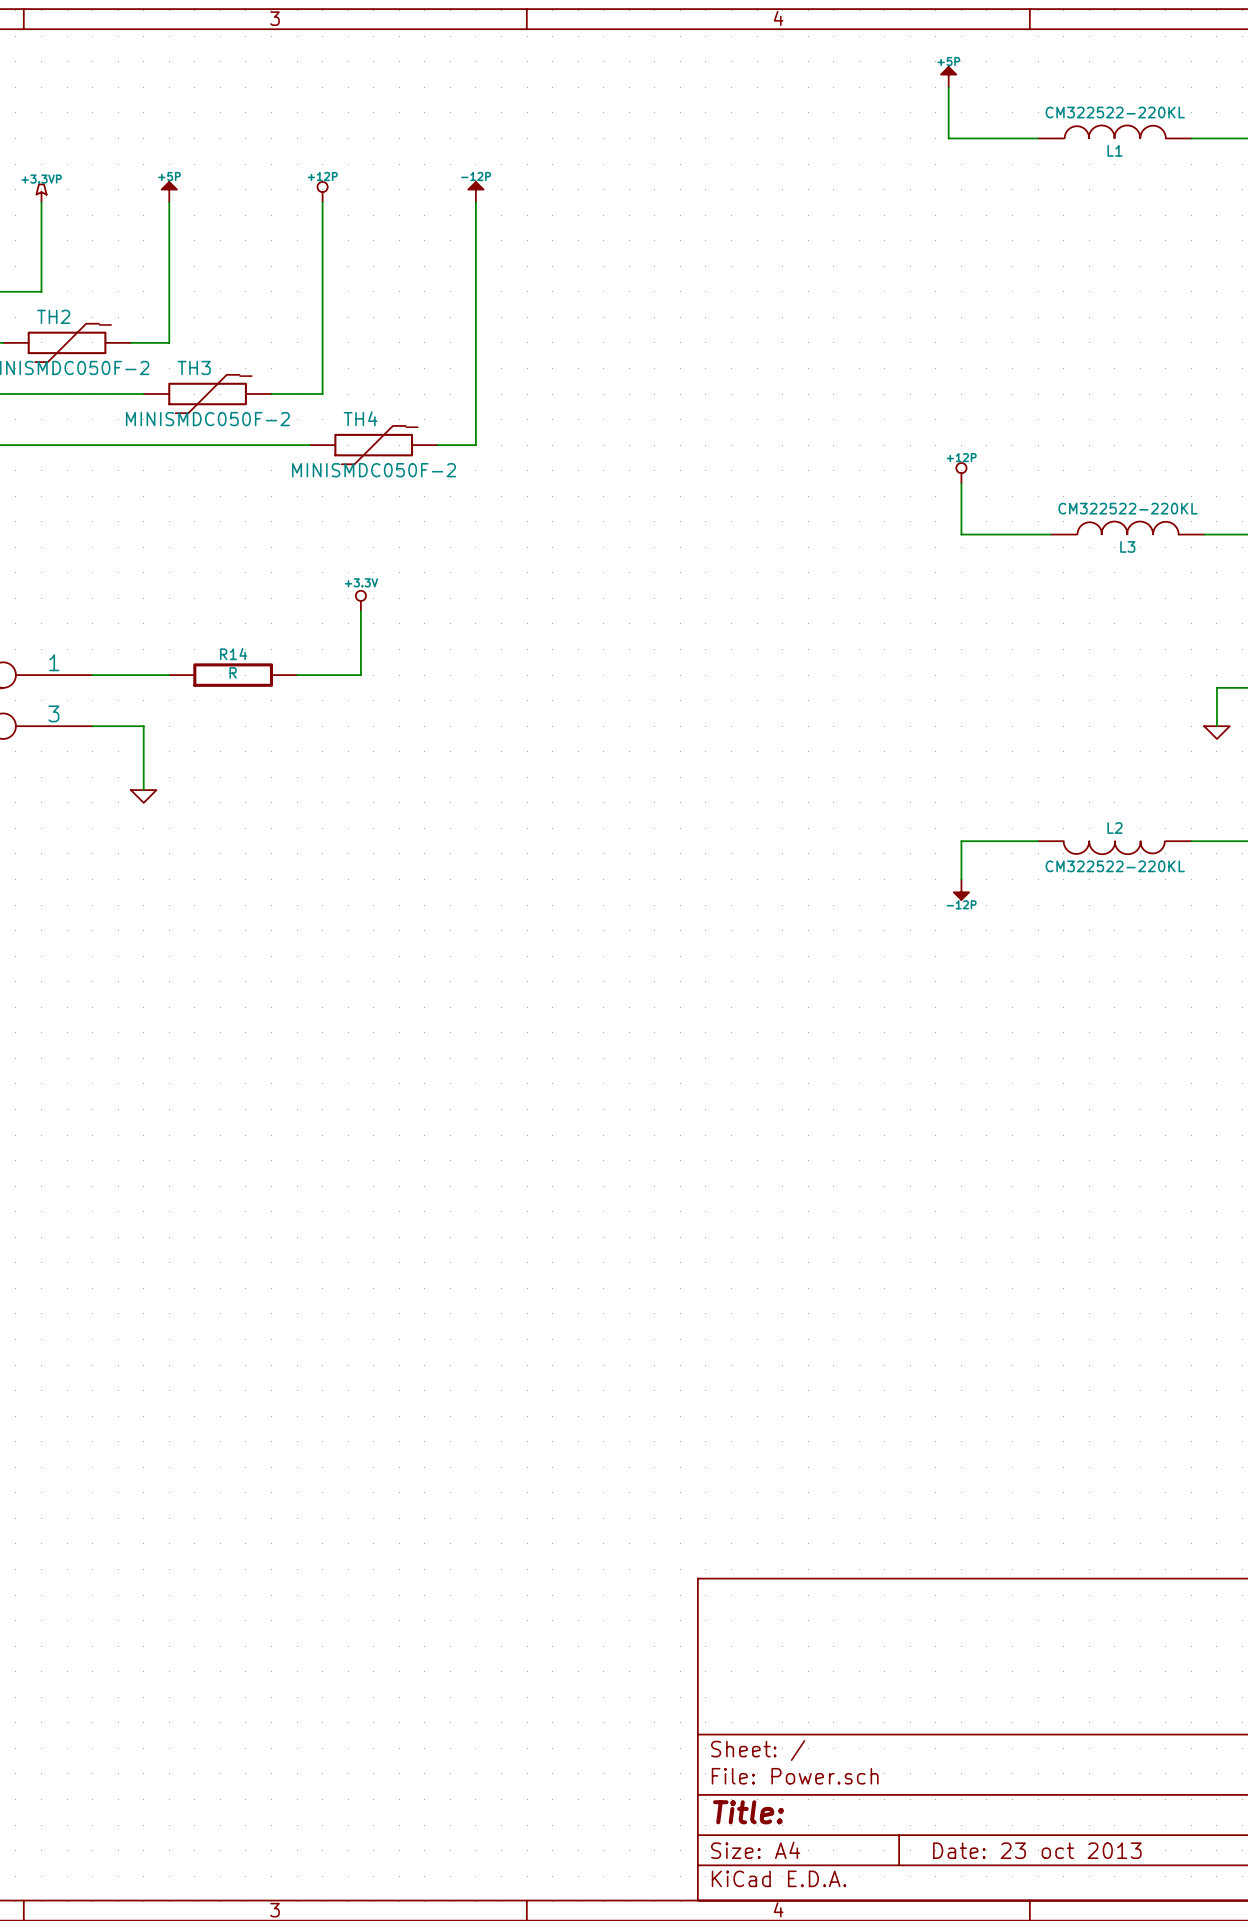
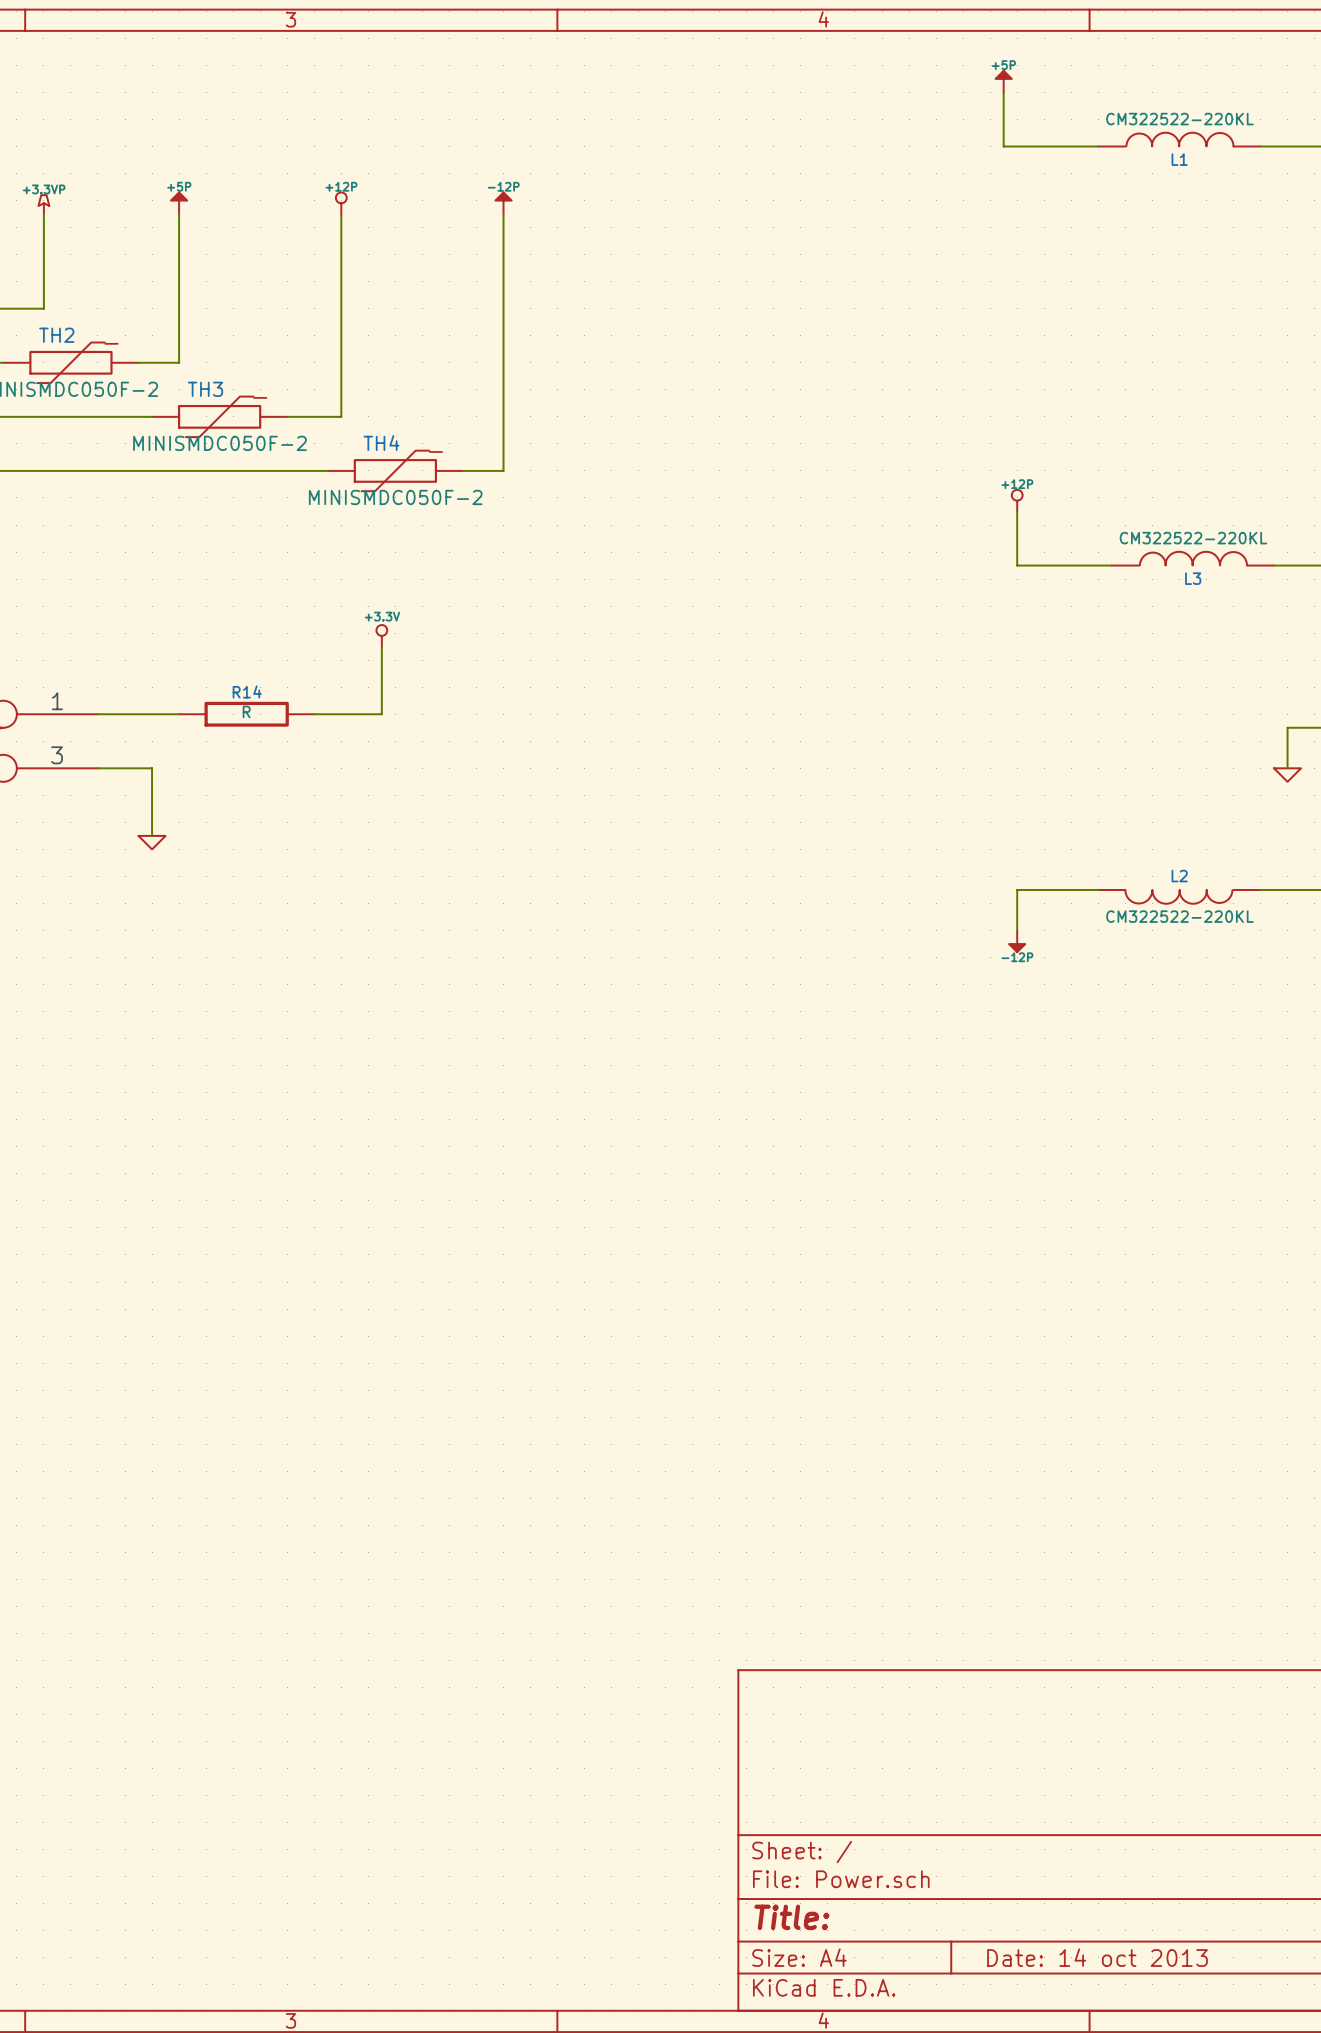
title block: Date: 23 oct 2013 (1037, 1850) -> Date: 14 oct 2013 (1097, 1957)

